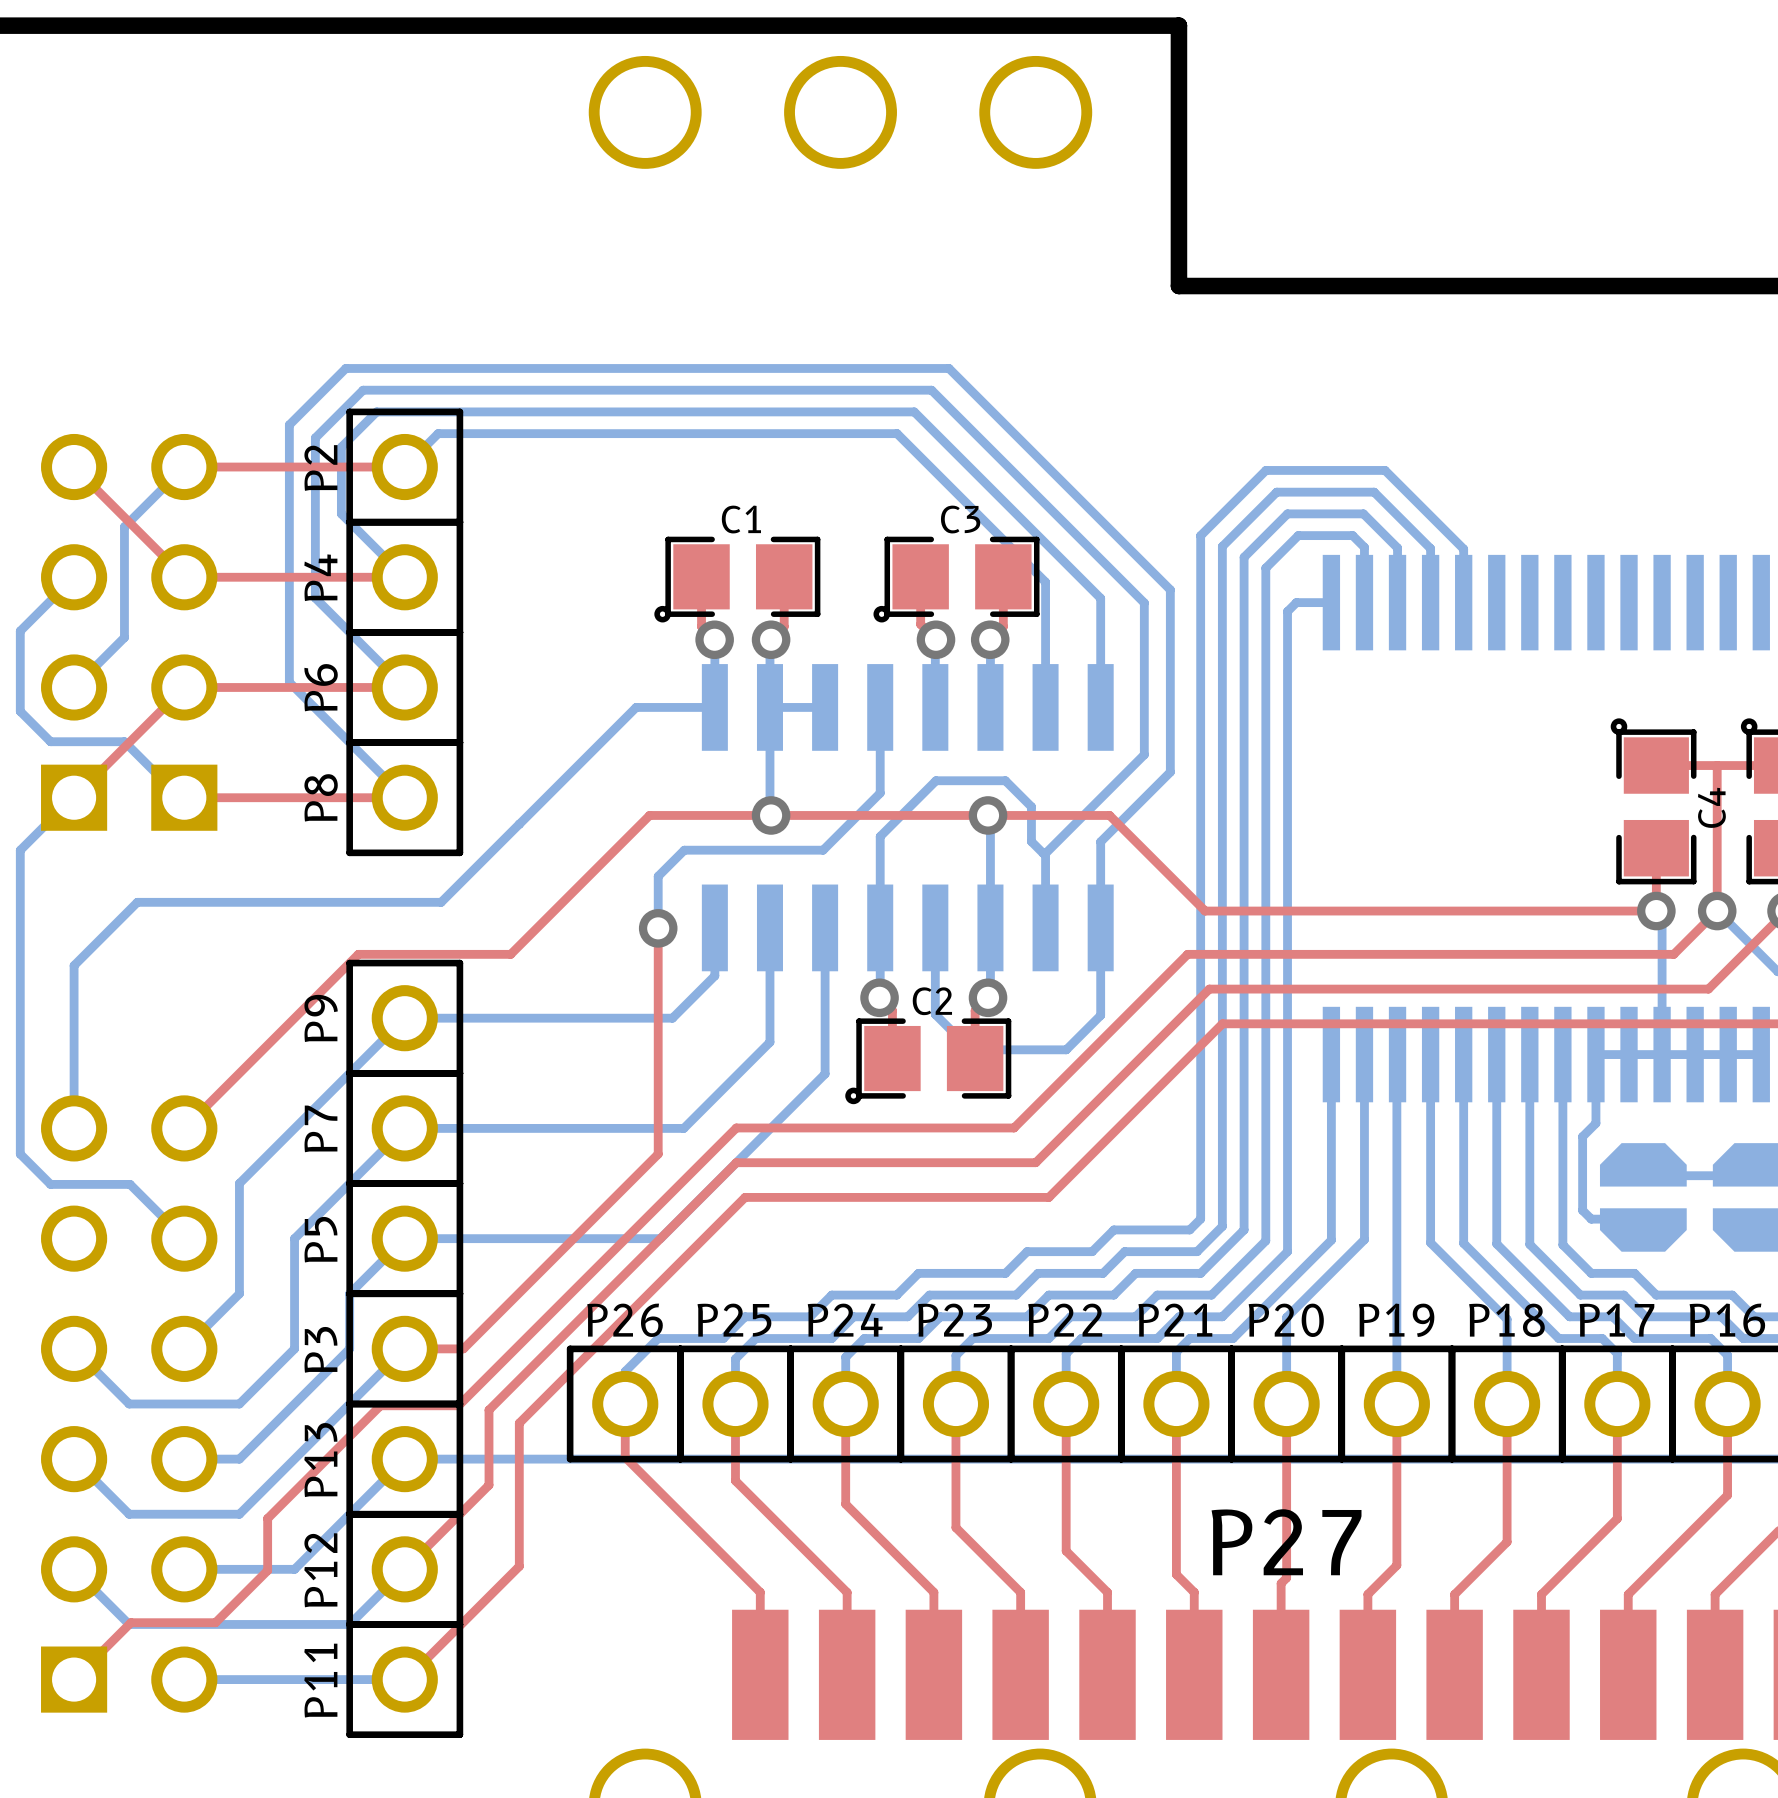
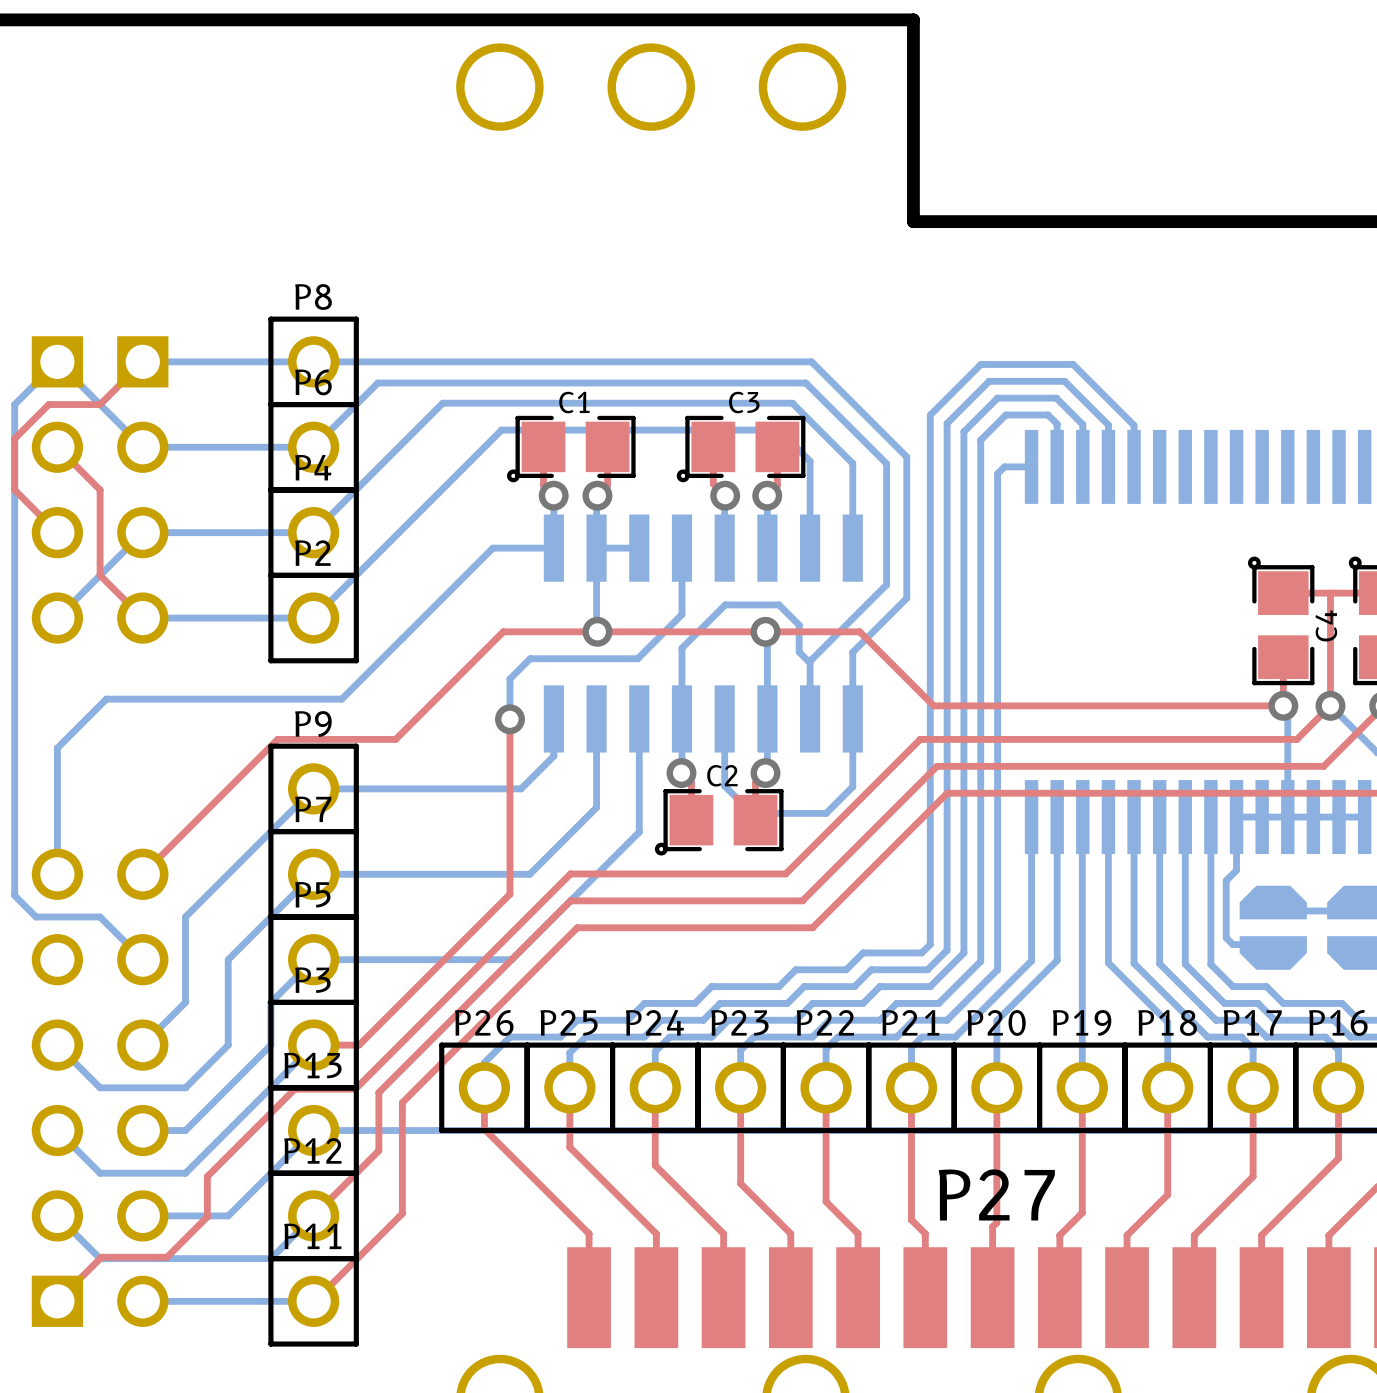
top track: (74, 467) (184, 577) (404, 577) -> none
top track: (184, 467) (404, 467) -> (142, 361) (100, 404) (48, 404) (14, 438) (14, 489) (57, 532)
bottom track: (184, 467) (124, 526) (124, 637) (74, 687) -> none
P2 name: P2 (320, 467) -> P8 (313, 297)
bottom track: (404, 467) (438, 433) (897, 433) (1045, 582) (1045, 595) -> (142, 618) (313, 618) (501, 430) (778, 430) (810, 461)
bottom track: (1047, 467) (949, 368) (345, 368) (289, 424) (289, 682) (404, 797) -> (811, 361) (142, 361)
bottom track: (1022, 520) (914, 411) (376, 411) (341, 447) (341, 513) (404, 577) -> (792, 403) (442, 403) (313, 532)
bottom track: (74, 577) (20, 631) (20, 711) (50, 741) (124, 741) (180, 797) (184, 797) -> none
P4 name: P4 (320, 577) -> P6 (313, 382)
bottom track: (1144, 602) (931, 390) (363, 390) (315, 437) (315, 598) (404, 687) -> (886, 467) (886, 463) (805, 383) (377, 383) (313, 447) (142, 447) (57, 361) (14, 404) (14, 895) (36, 917) (100, 917)
part rotation: 0° (74, 632) -> 180° (57, 489)
part rotation: 0° (184, 632) -> 180° (142, 489)
P6 name: P6 (321, 687) -> P4 (313, 467)
top track: (404, 687) (184, 687) (74, 797) -> none
bottom track: (74, 797) (20, 850) (20, 1154) (50, 1184) (130, 1184) -> (57, 618) (142, 532) (313, 532)
top track: (184, 797) (404, 797) -> (142, 618) (100, 575) (100, 489) (57, 447)
P8 name: P8 (321, 797) -> P2 (312, 553)
P9 name rotation: 0° (321, 1018) -> 90° clockwise (313, 724)
P9 name position: P9 (321, 1018) -> P9 (313, 724)
P7 name rotation: 0° (320, 1128) -> 90° clockwise (313, 809)
P7 name position: P7 (320, 1128) -> P7 (313, 809)
P5 name rotation: 0° (320, 1239) -> 90° clockwise (312, 894)
P5 name position: P5 (320, 1239) -> P5 (312, 894)
P3 name rotation: 0° (320, 1349) -> 90° clockwise (312, 980)
P3 name position: P3 (320, 1349) -> P3 (312, 980)
P13 name rotation: 0° (320, 1460) -> 90° clockwise (312, 1065)
P13 name position: P13 (320, 1460) -> P13 (312, 1065)
P12 name rotation: 0° (320, 1570) -> 90° clockwise (312, 1150)
P12 name position: P12 (320, 1570) -> P12 (312, 1150)
P11 name rotation: 0° (320, 1680) -> 90° clockwise (312, 1236)
P11 name position: P11 (320, 1680) -> P11 (312, 1236)

